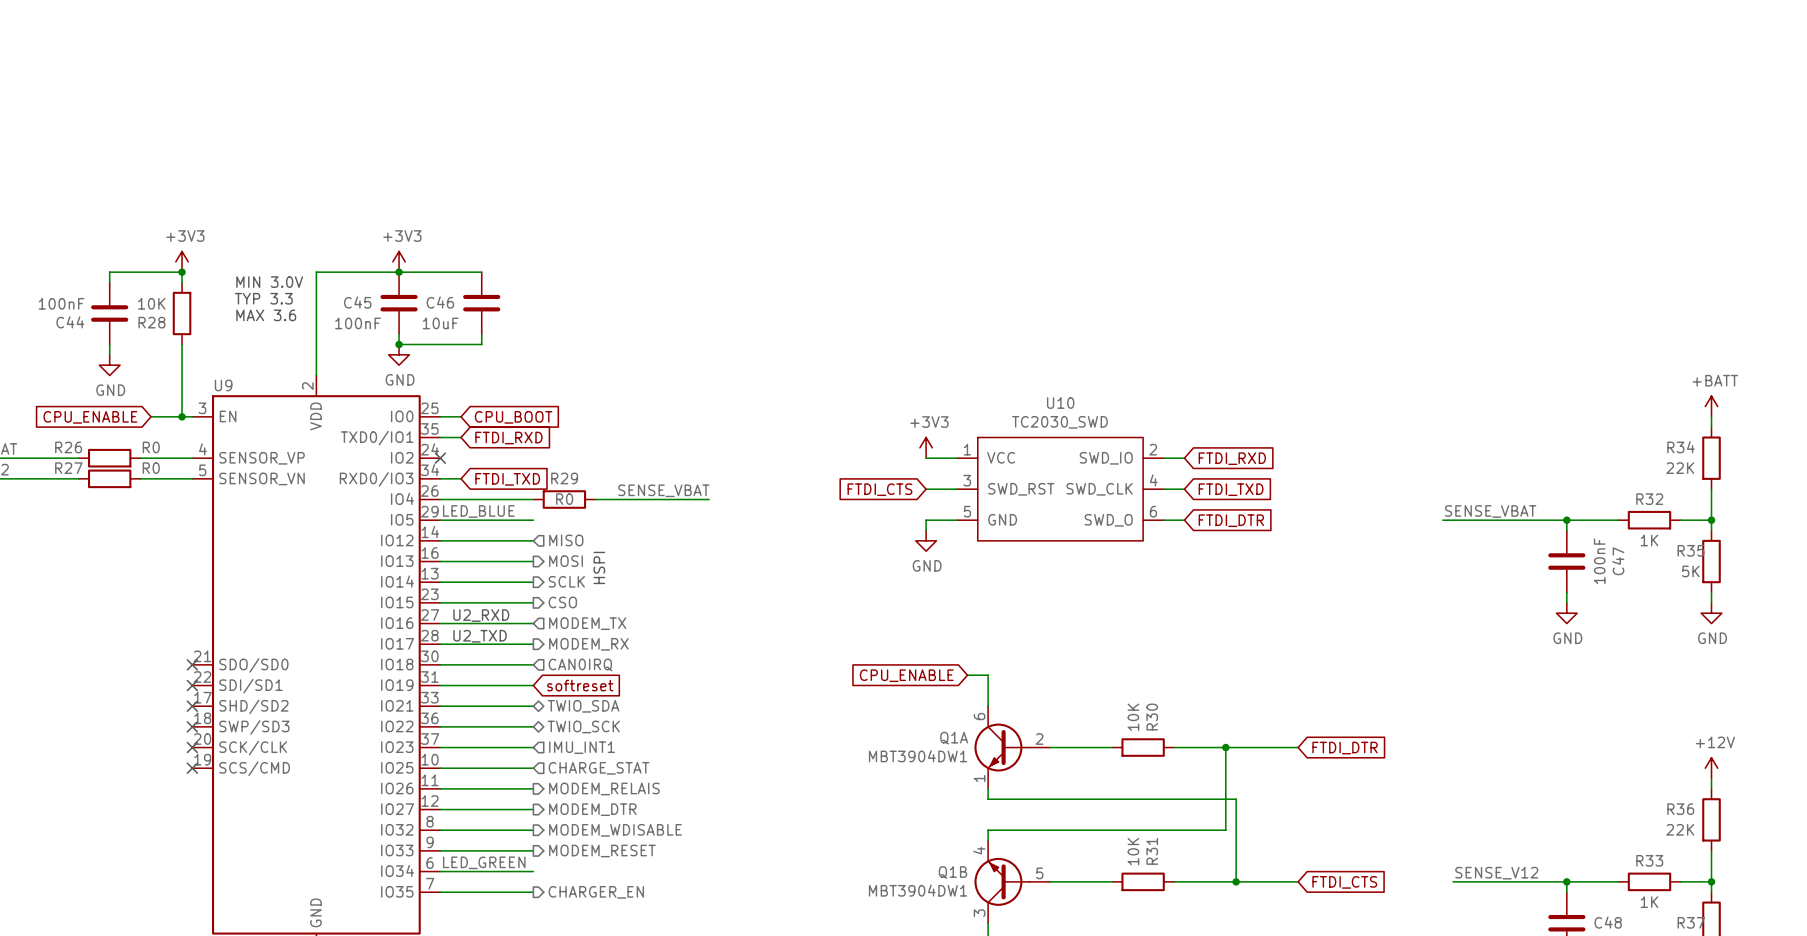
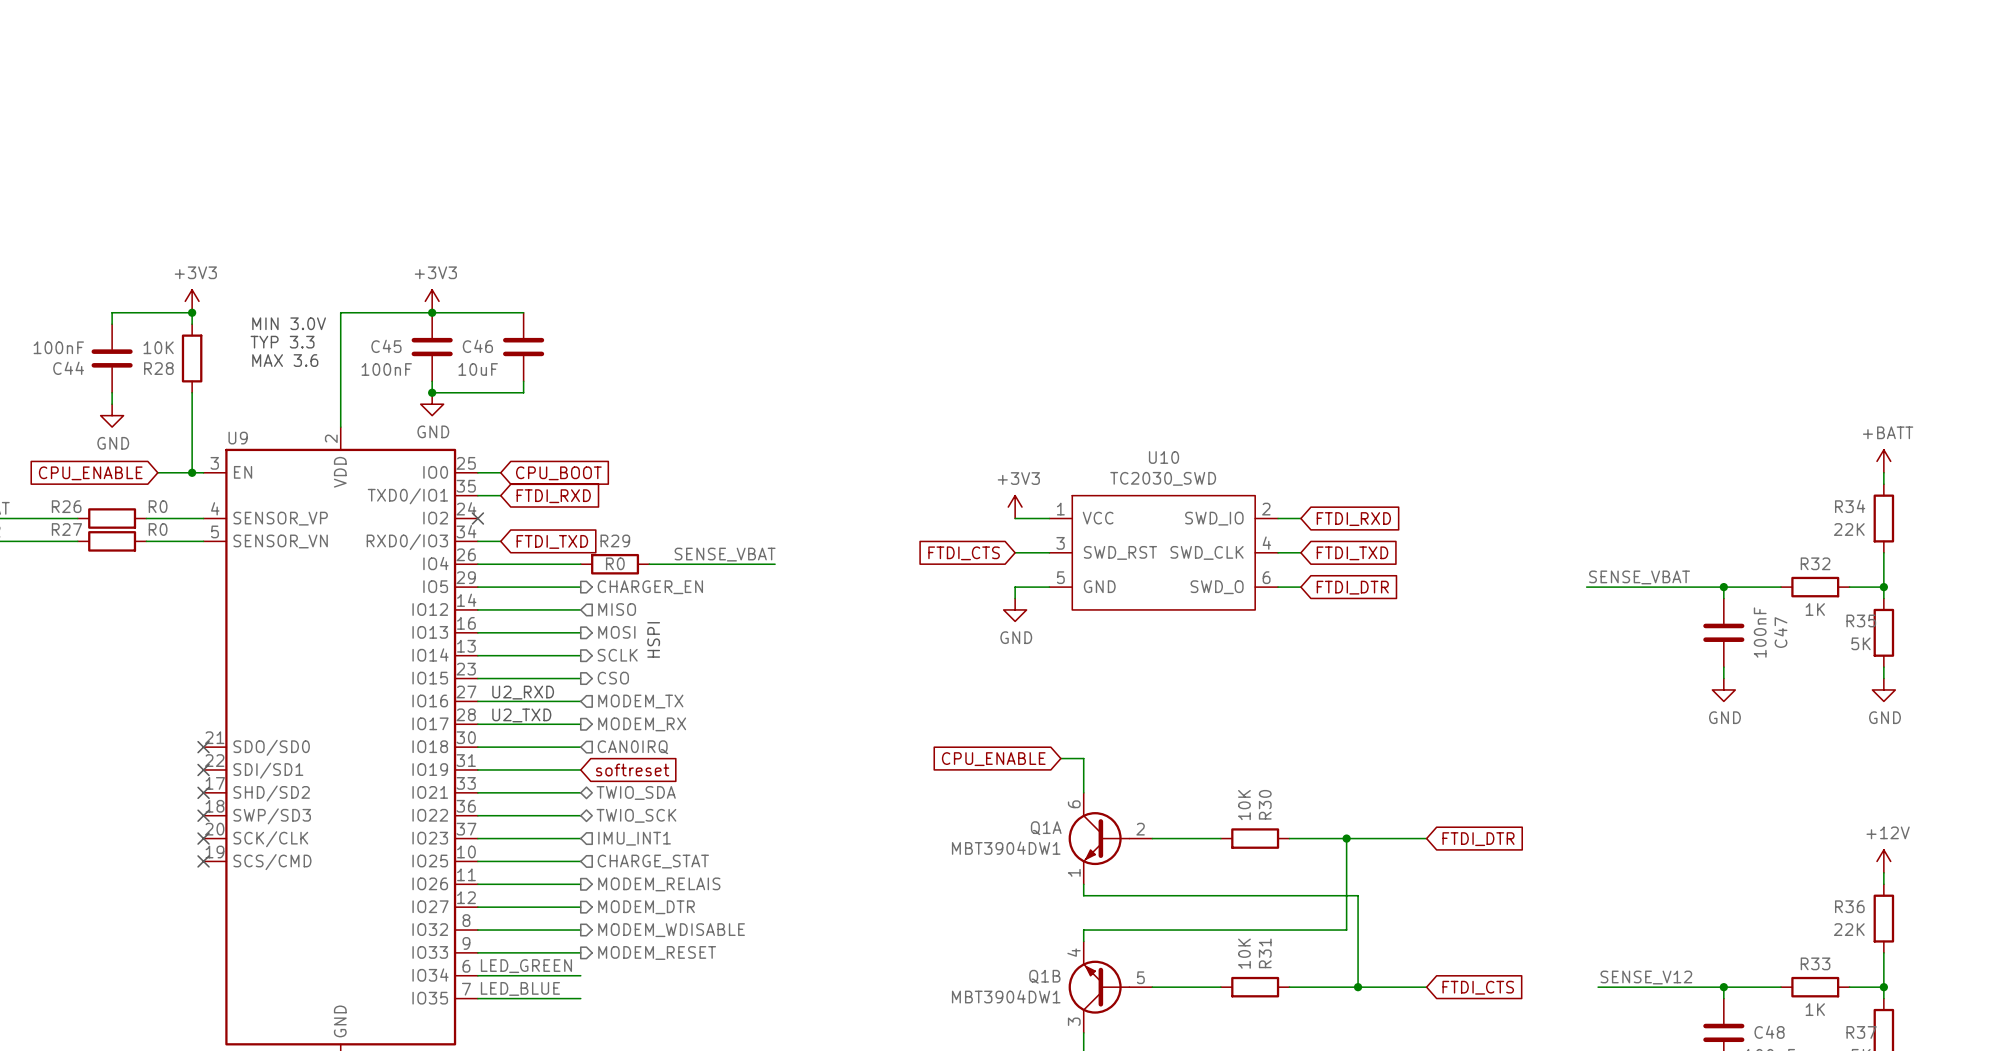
label: LED_BLUE (478, 511) -> none
hierarchical label: none -> CHARGER_EN (650, 587)
label: none -> LED_BLUE (520, 988)
hierarchical label: CHARGER_EN (596, 892) -> none

